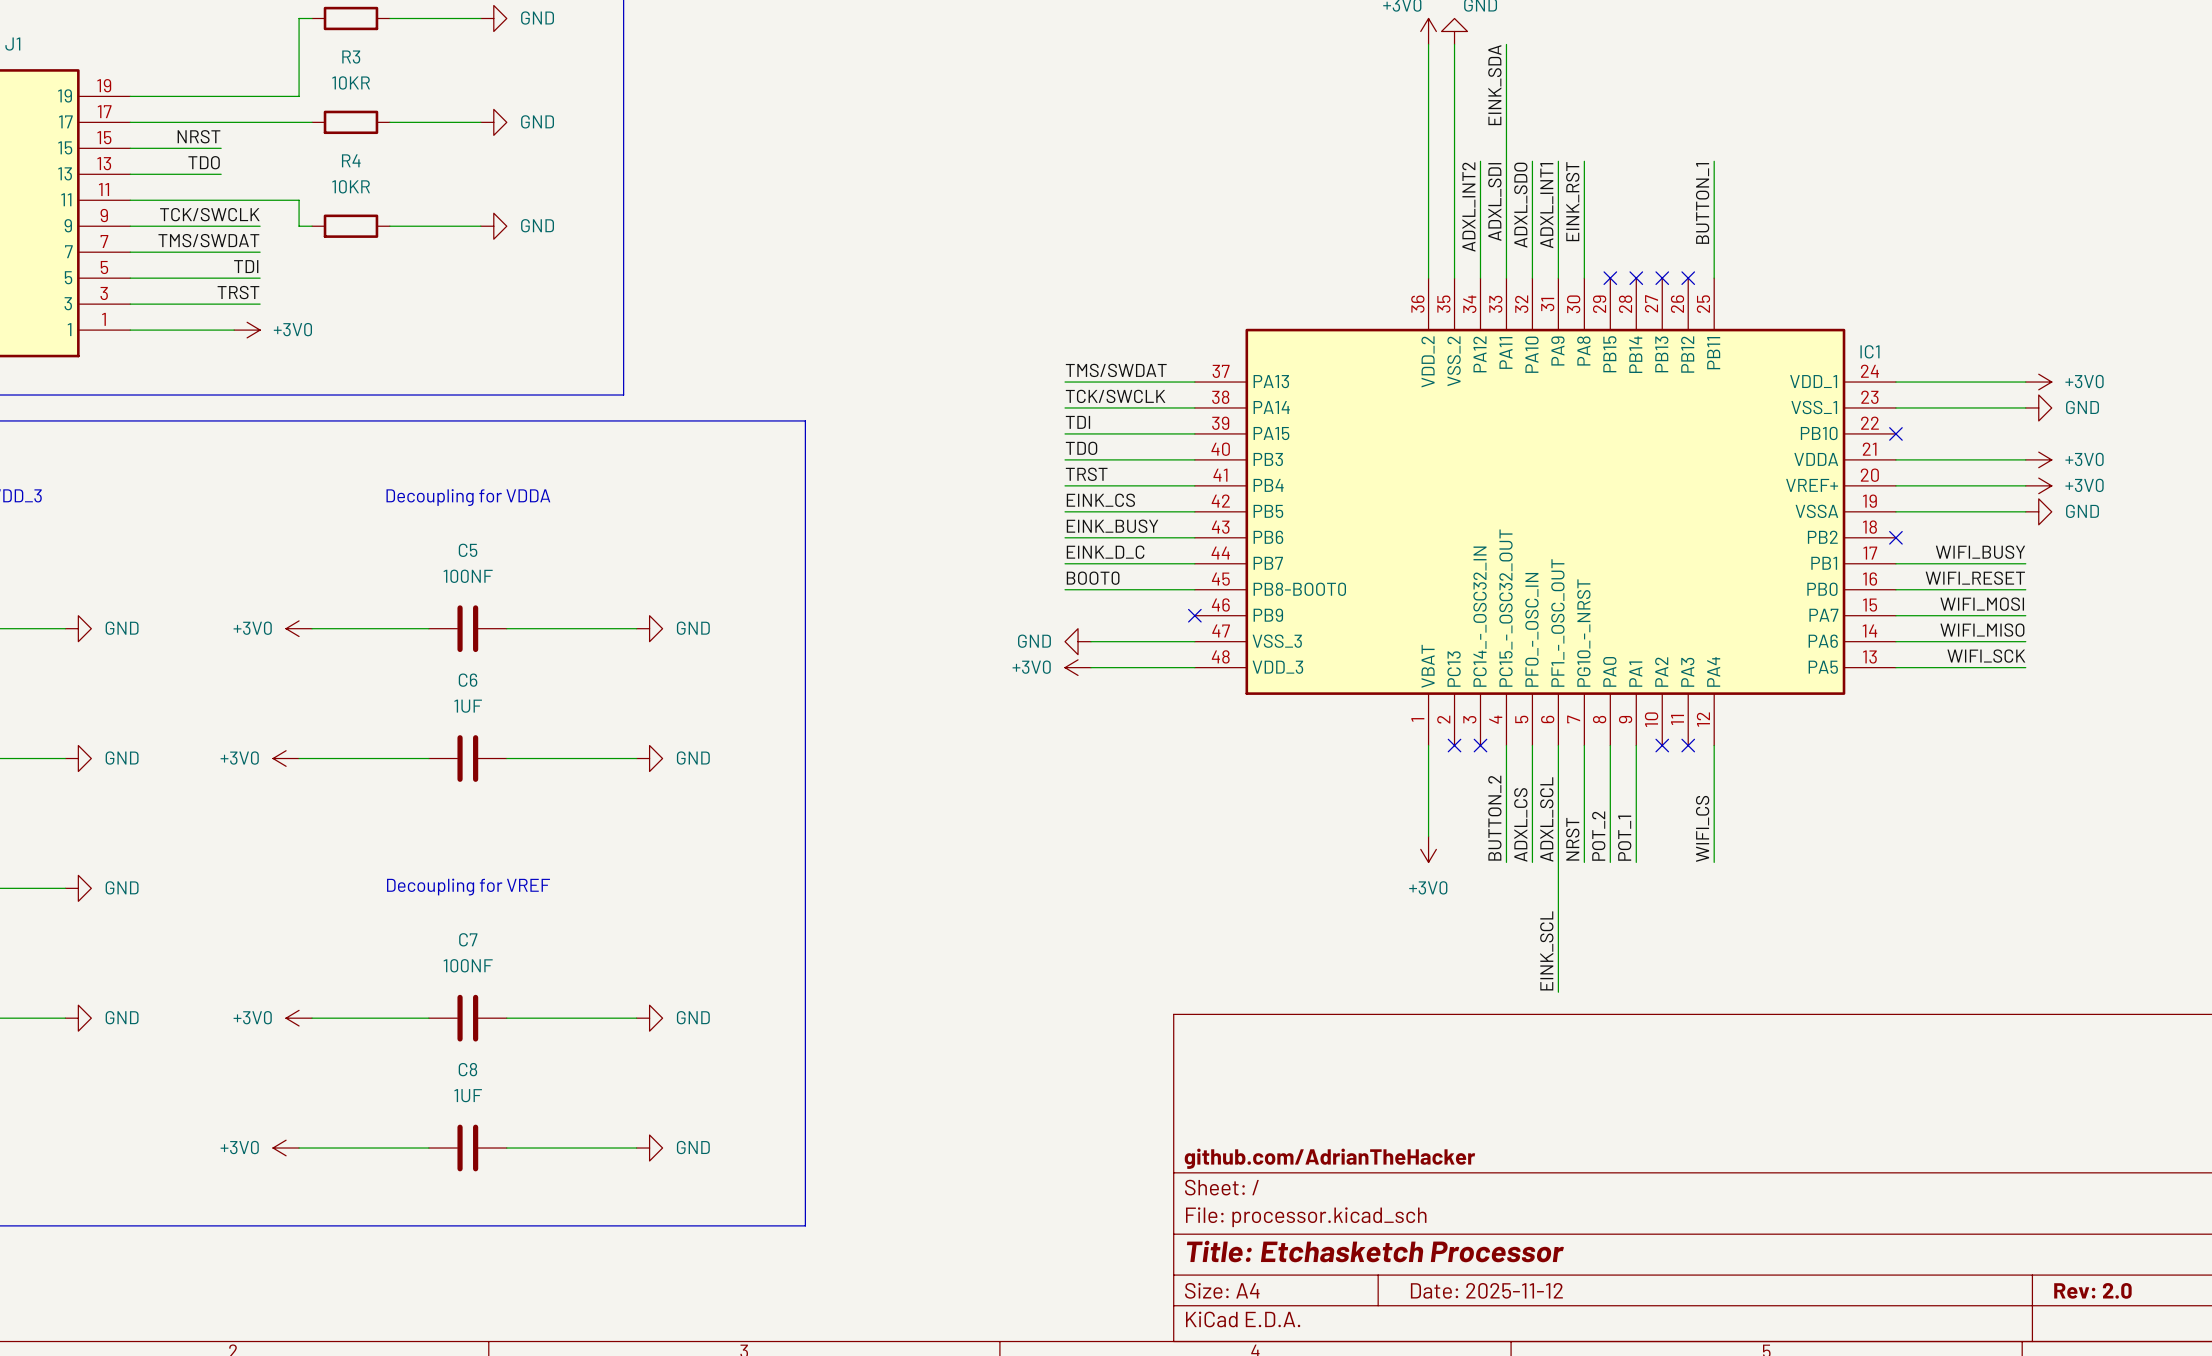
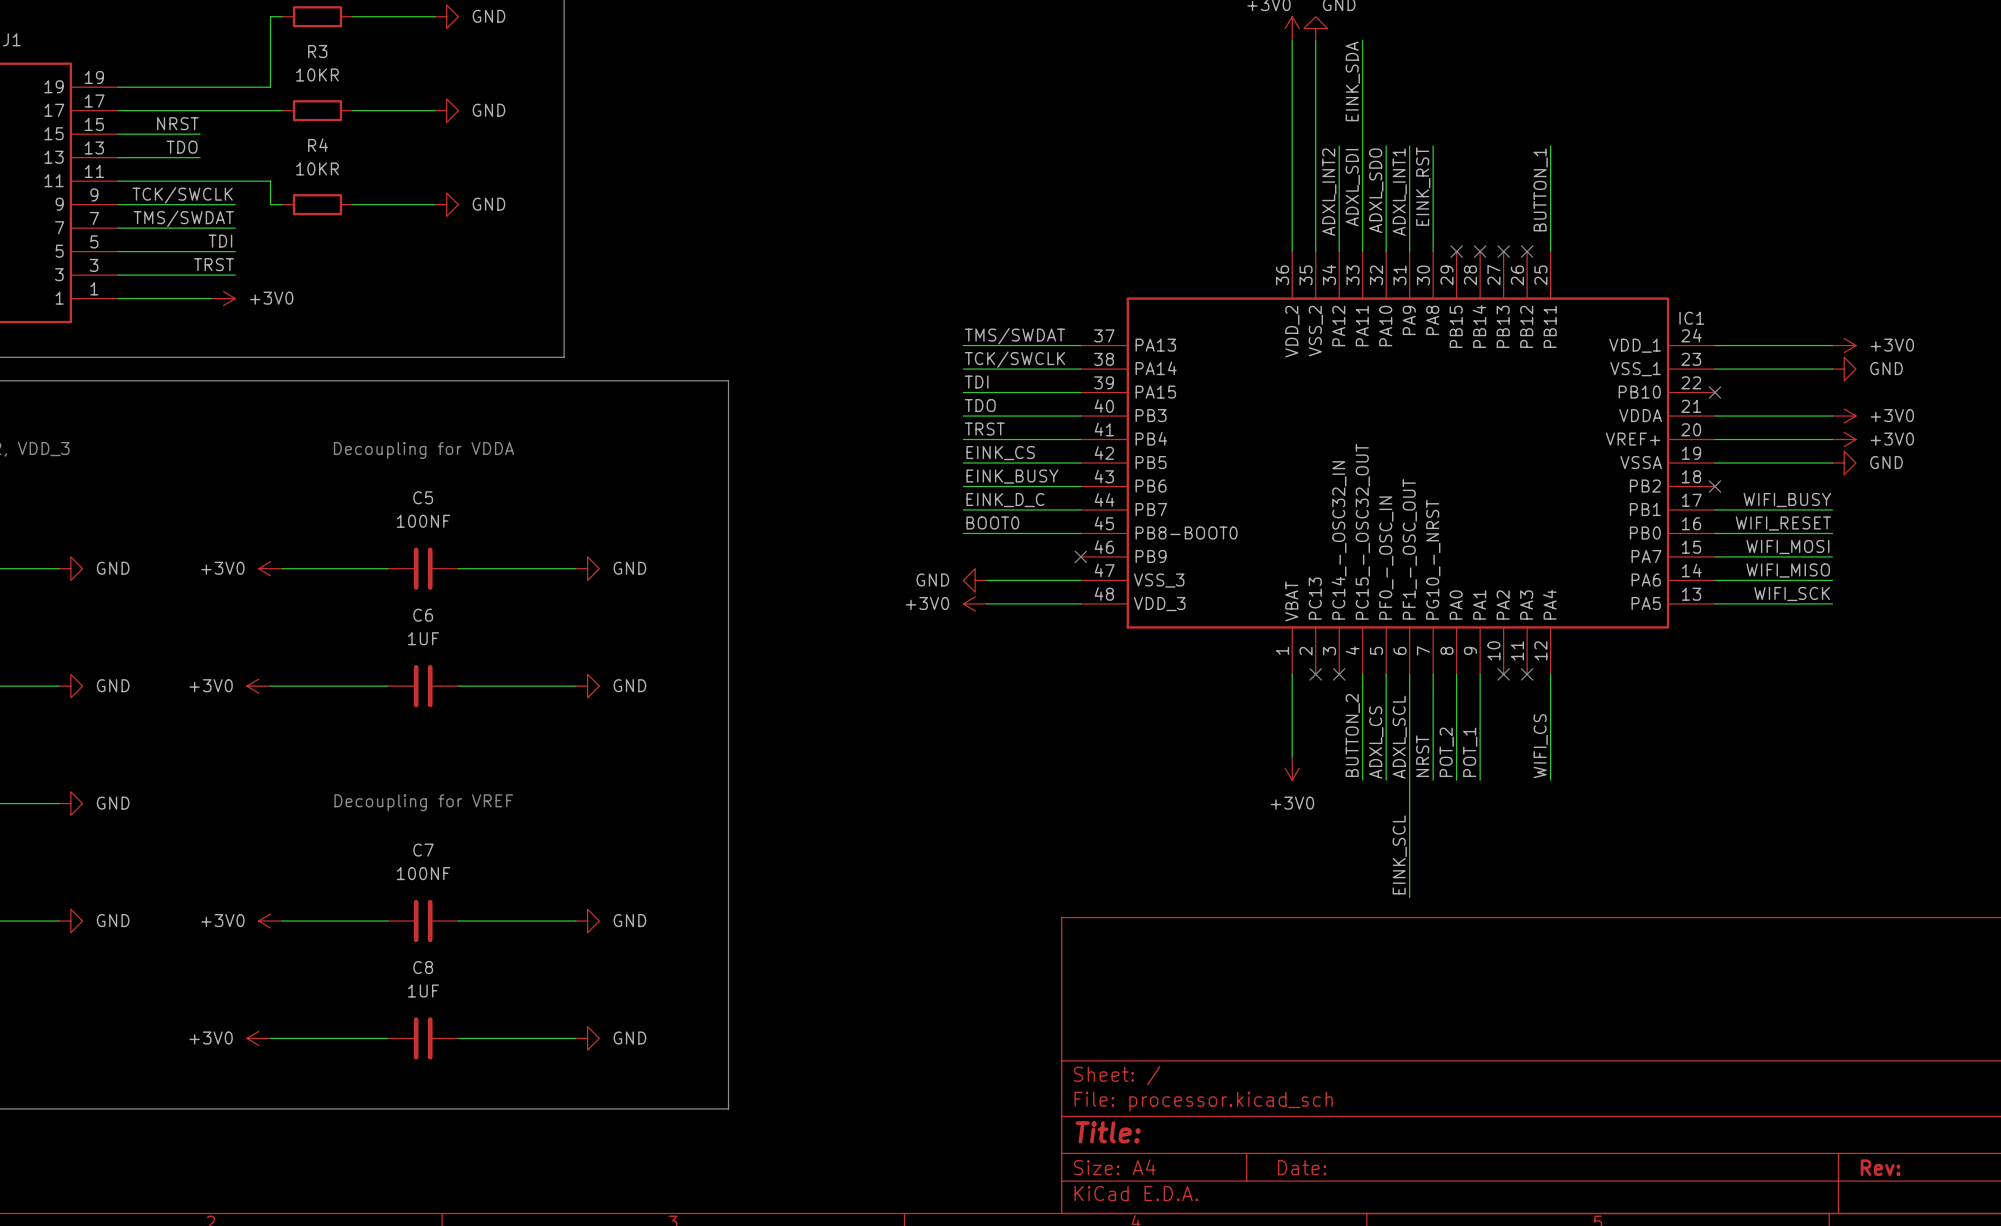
title block: github.com/AdrianTheHacker (1329, 1158) -> none
title block: Title: Etchasketch Processor (1375, 1251) -> Title: (1108, 1132)
title block: Date: 2025-11-12 (1486, 1290) -> Date: (1302, 1167)
title block: Rev: 2.0 (2092, 1290) -> Rev: (1880, 1167)

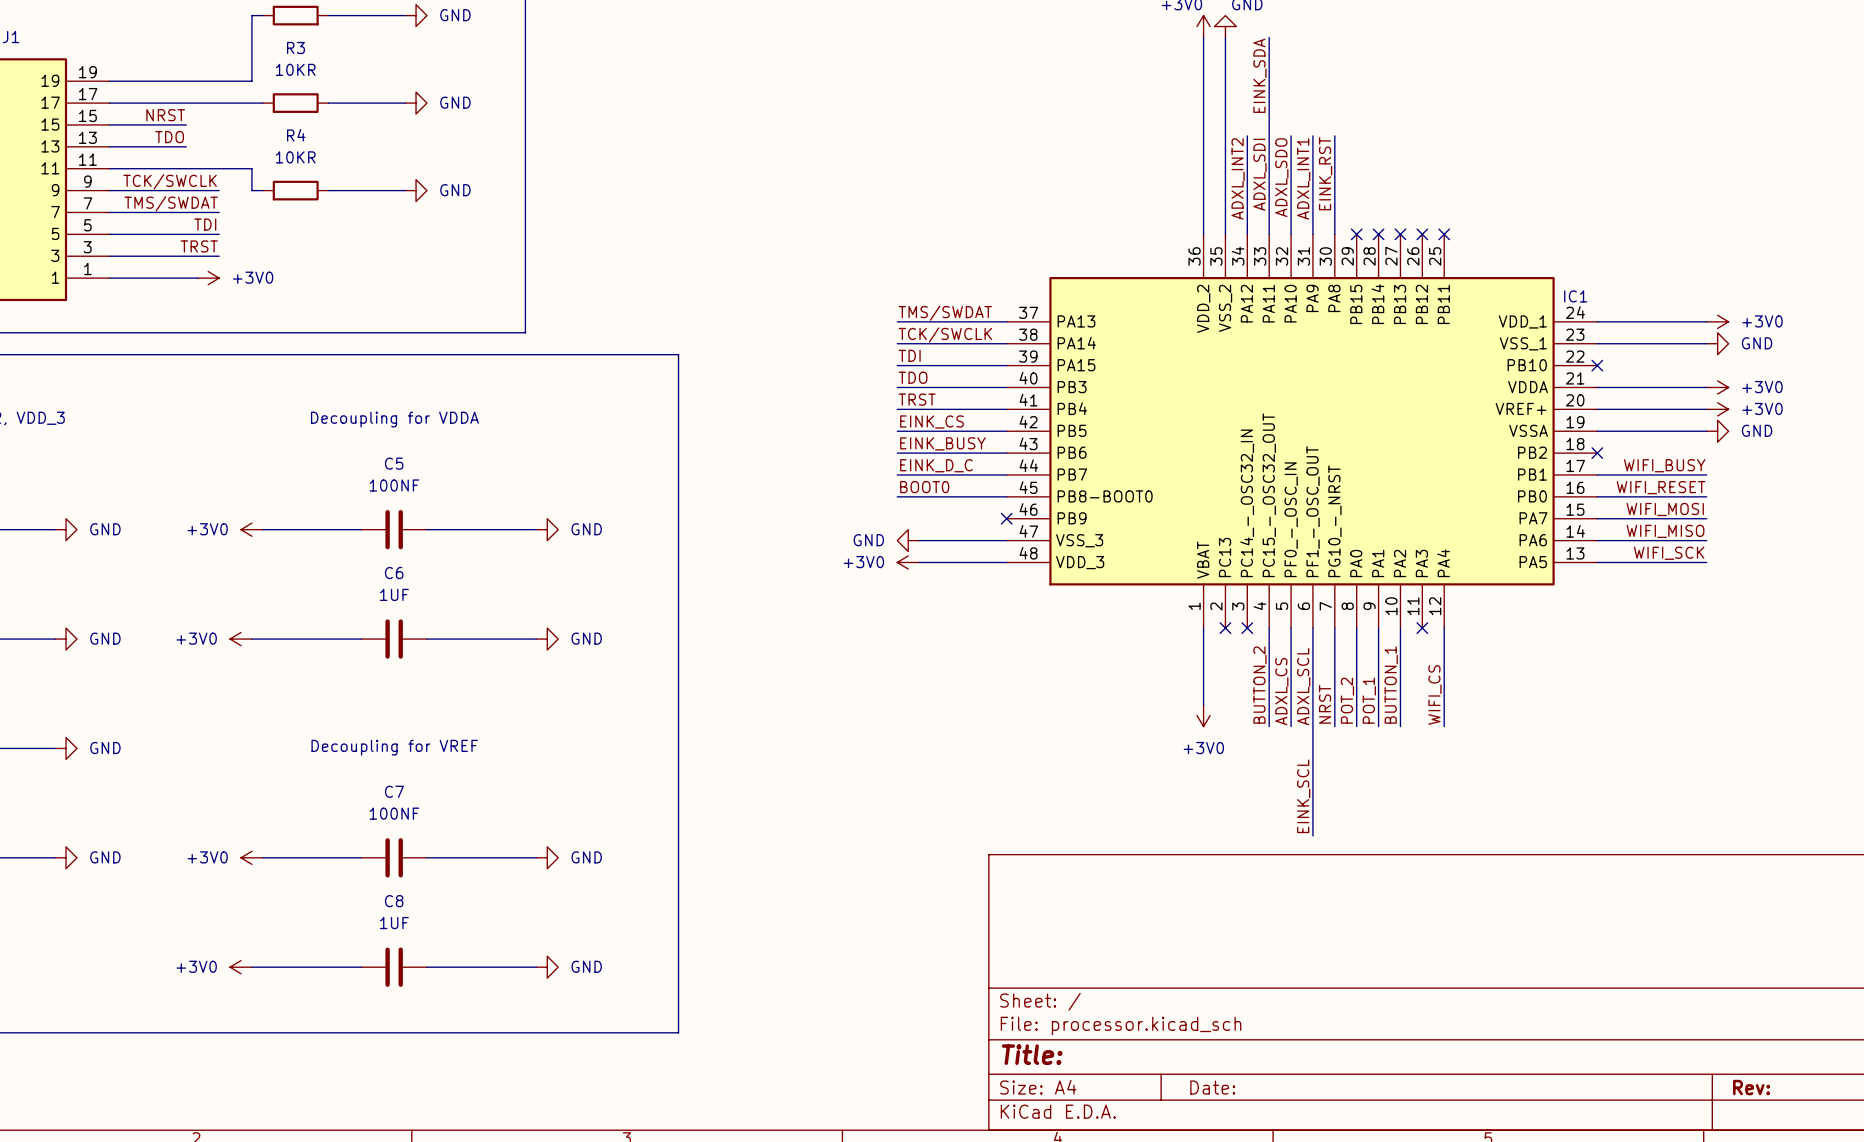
wire: (1550, 145) (1550, 251) -> none
label: BUTTON_1 (1540, 189) -> none
no-connect mark: none -> (1444, 234)
wire: none -> (1400, 628) (1400, 726)
no-connect mark: (1503, 674) -> none
label: none -> BUTTON_1 (1391, 685)

